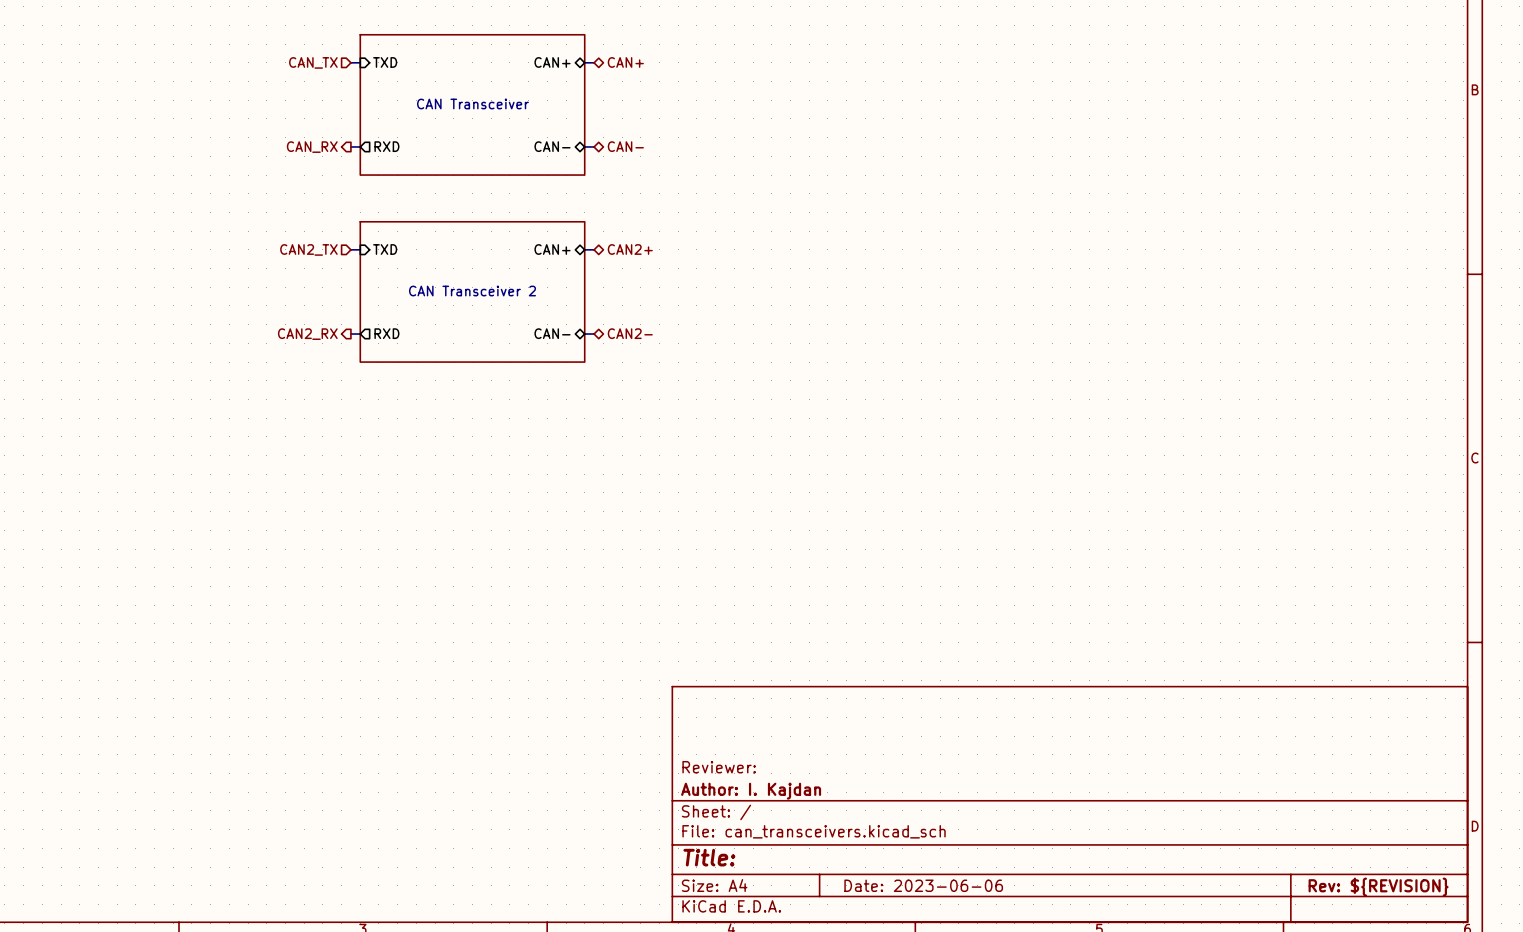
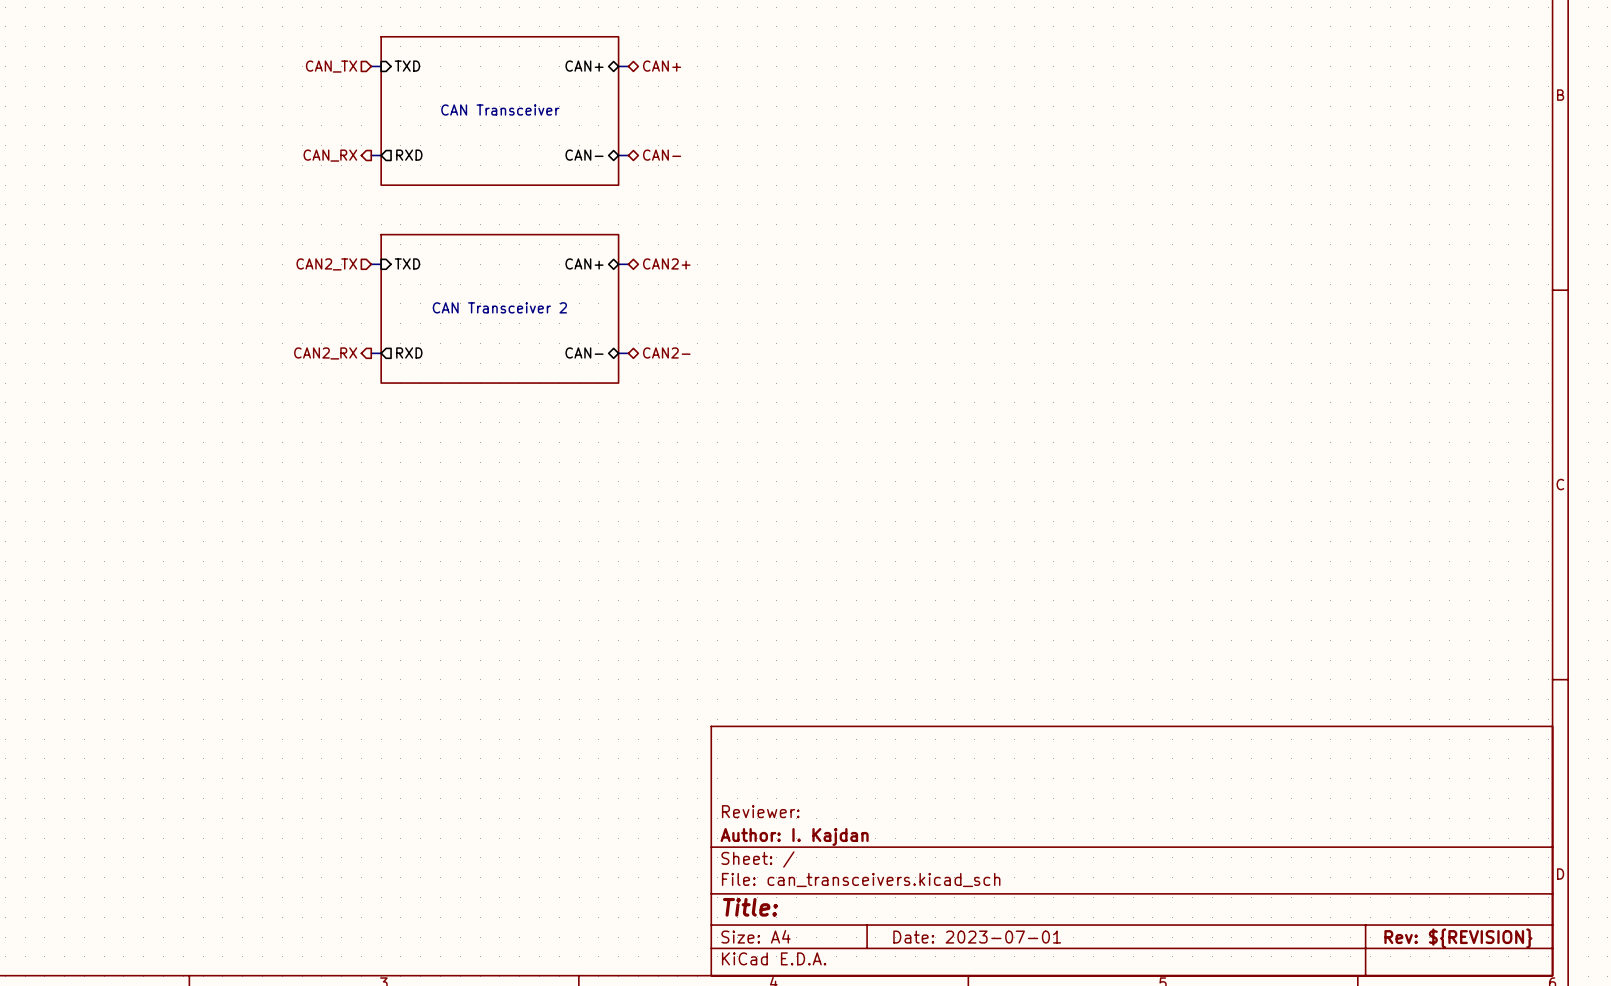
title block: Date: 2023-06-06 (923, 885) -> Date: 2023-07-01 (977, 937)

